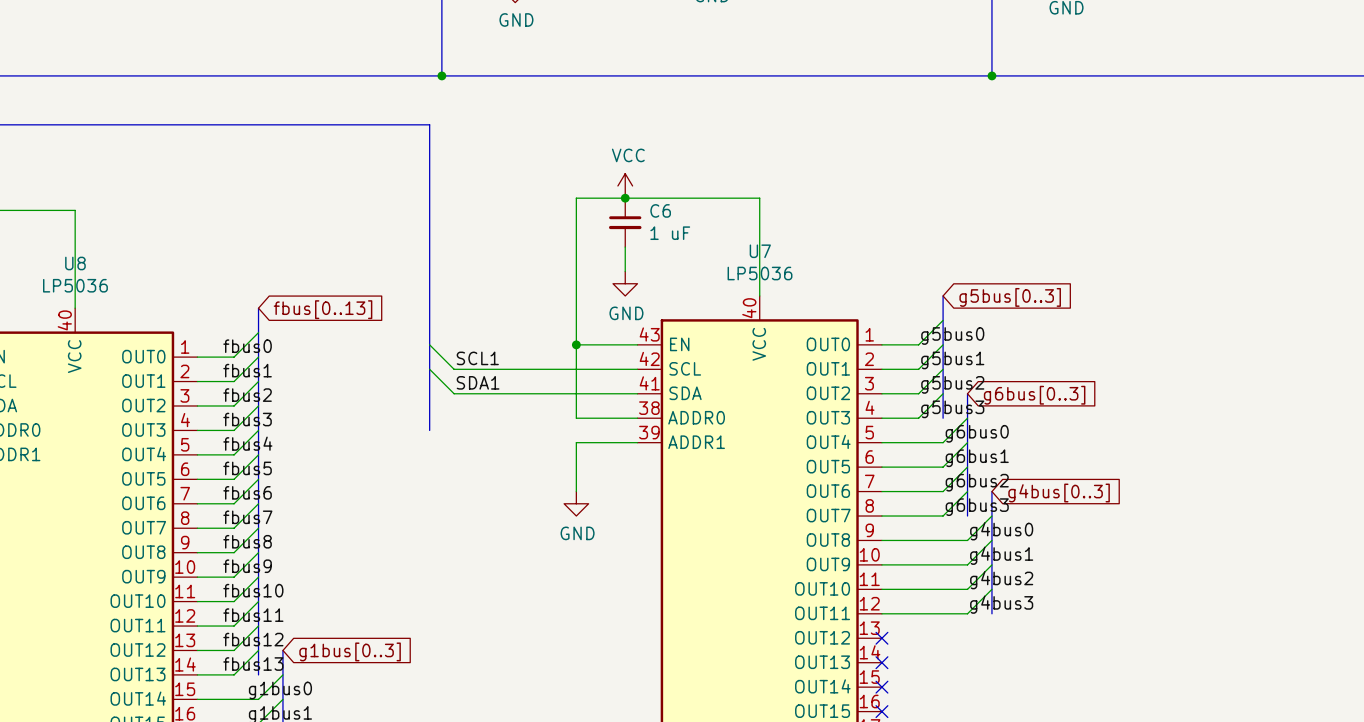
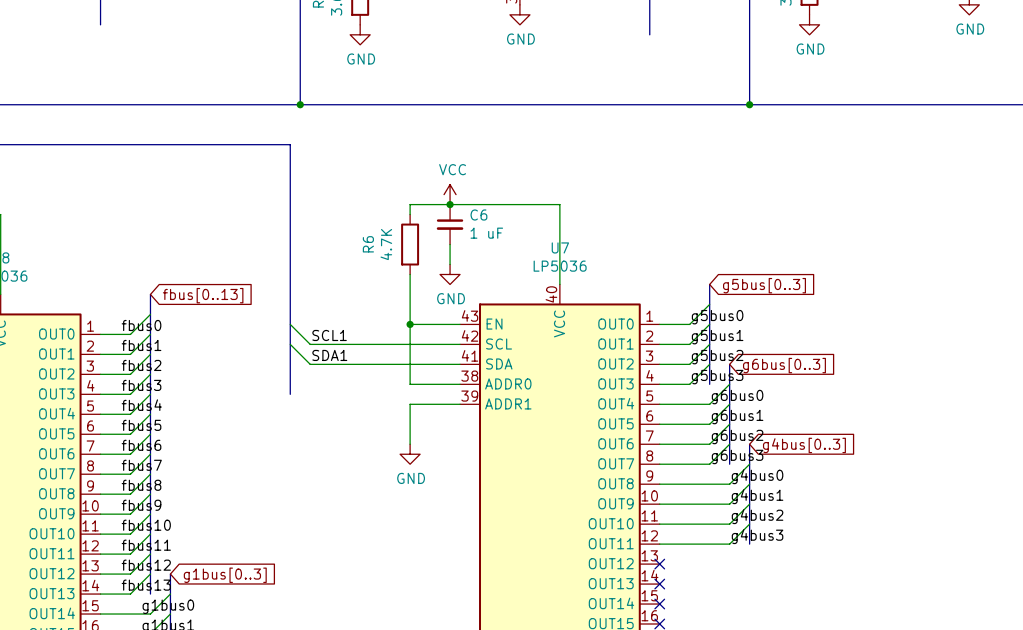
wire: (576, 210) (576, 283) -> none
R6: none -> 4.7K (410, 244)

